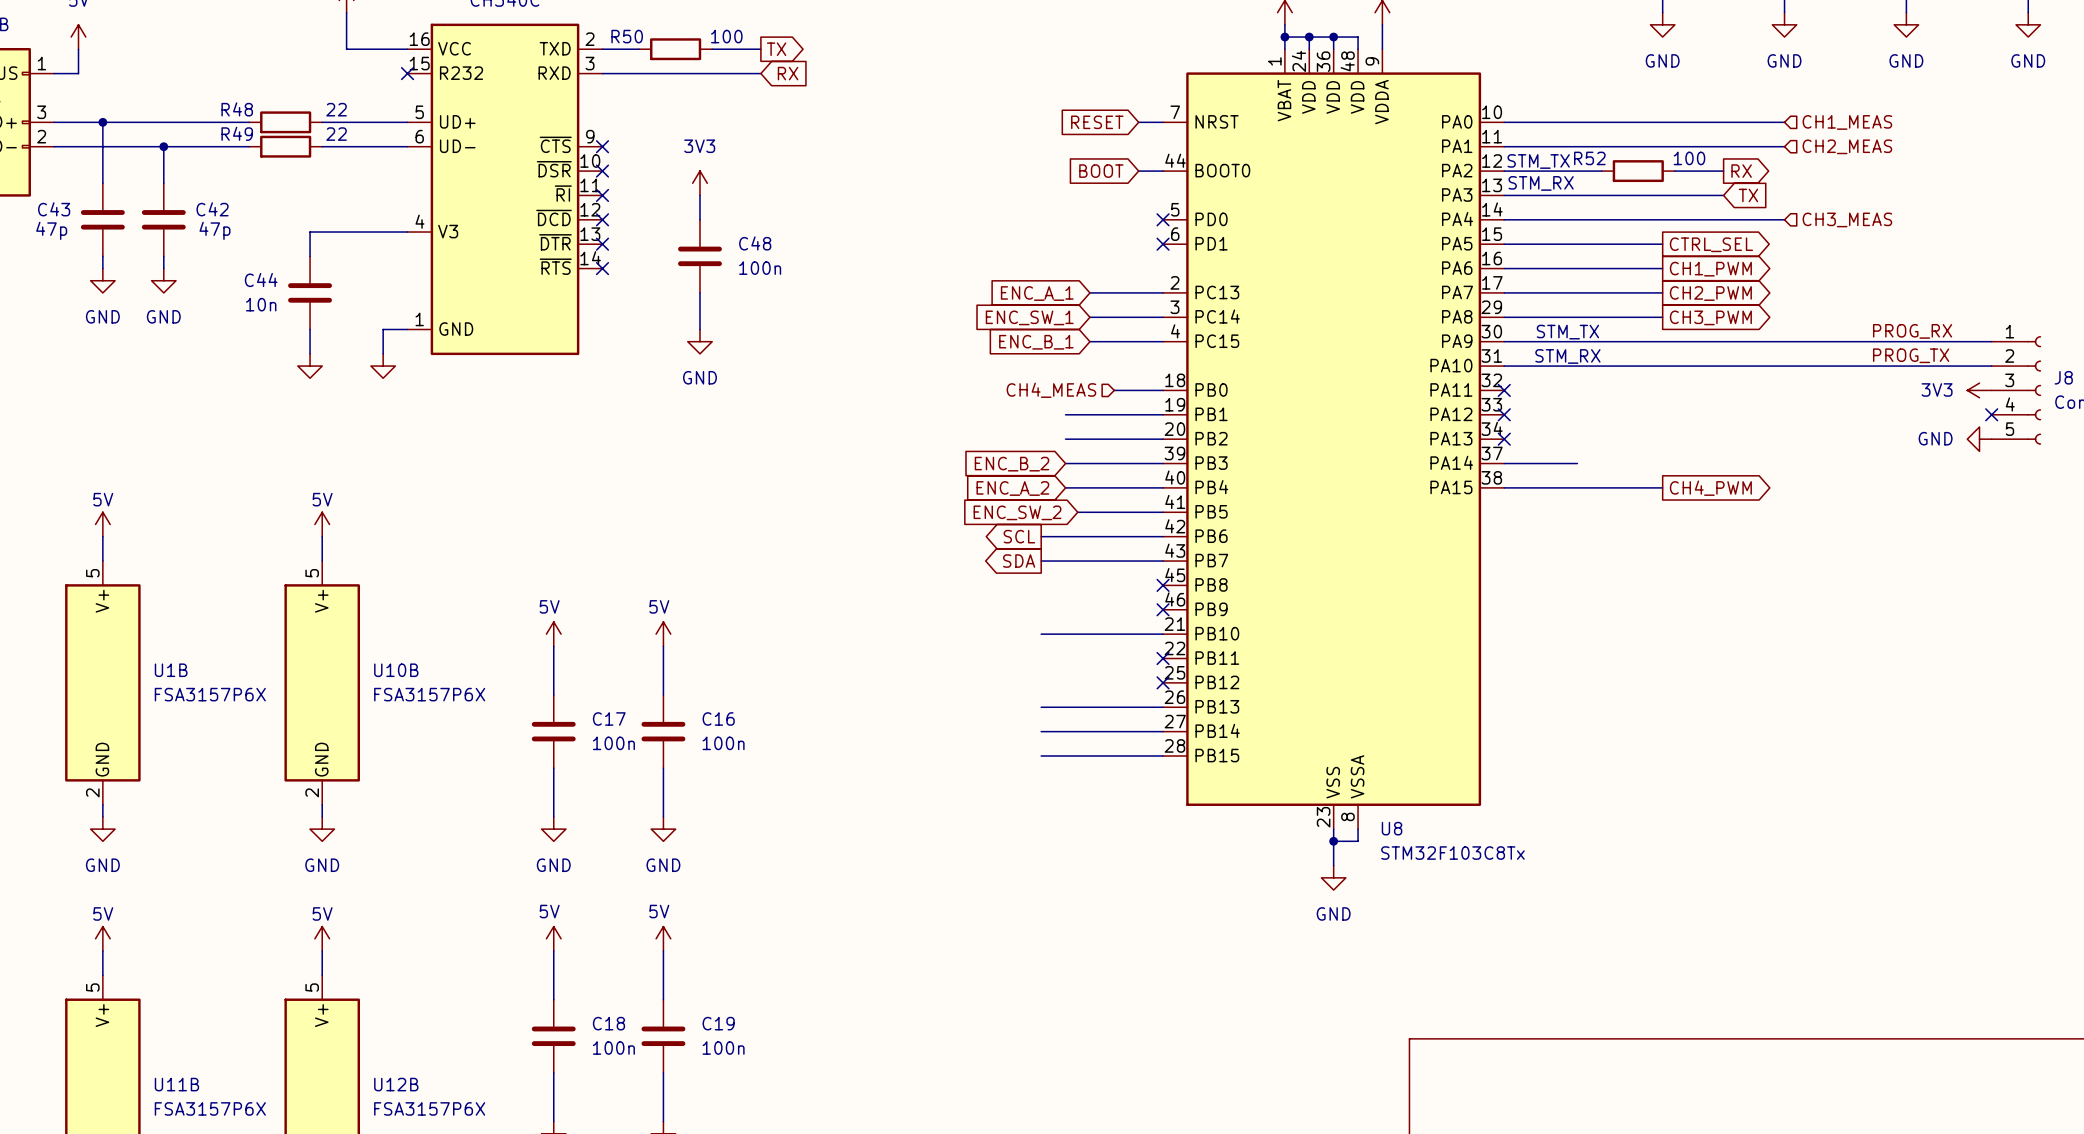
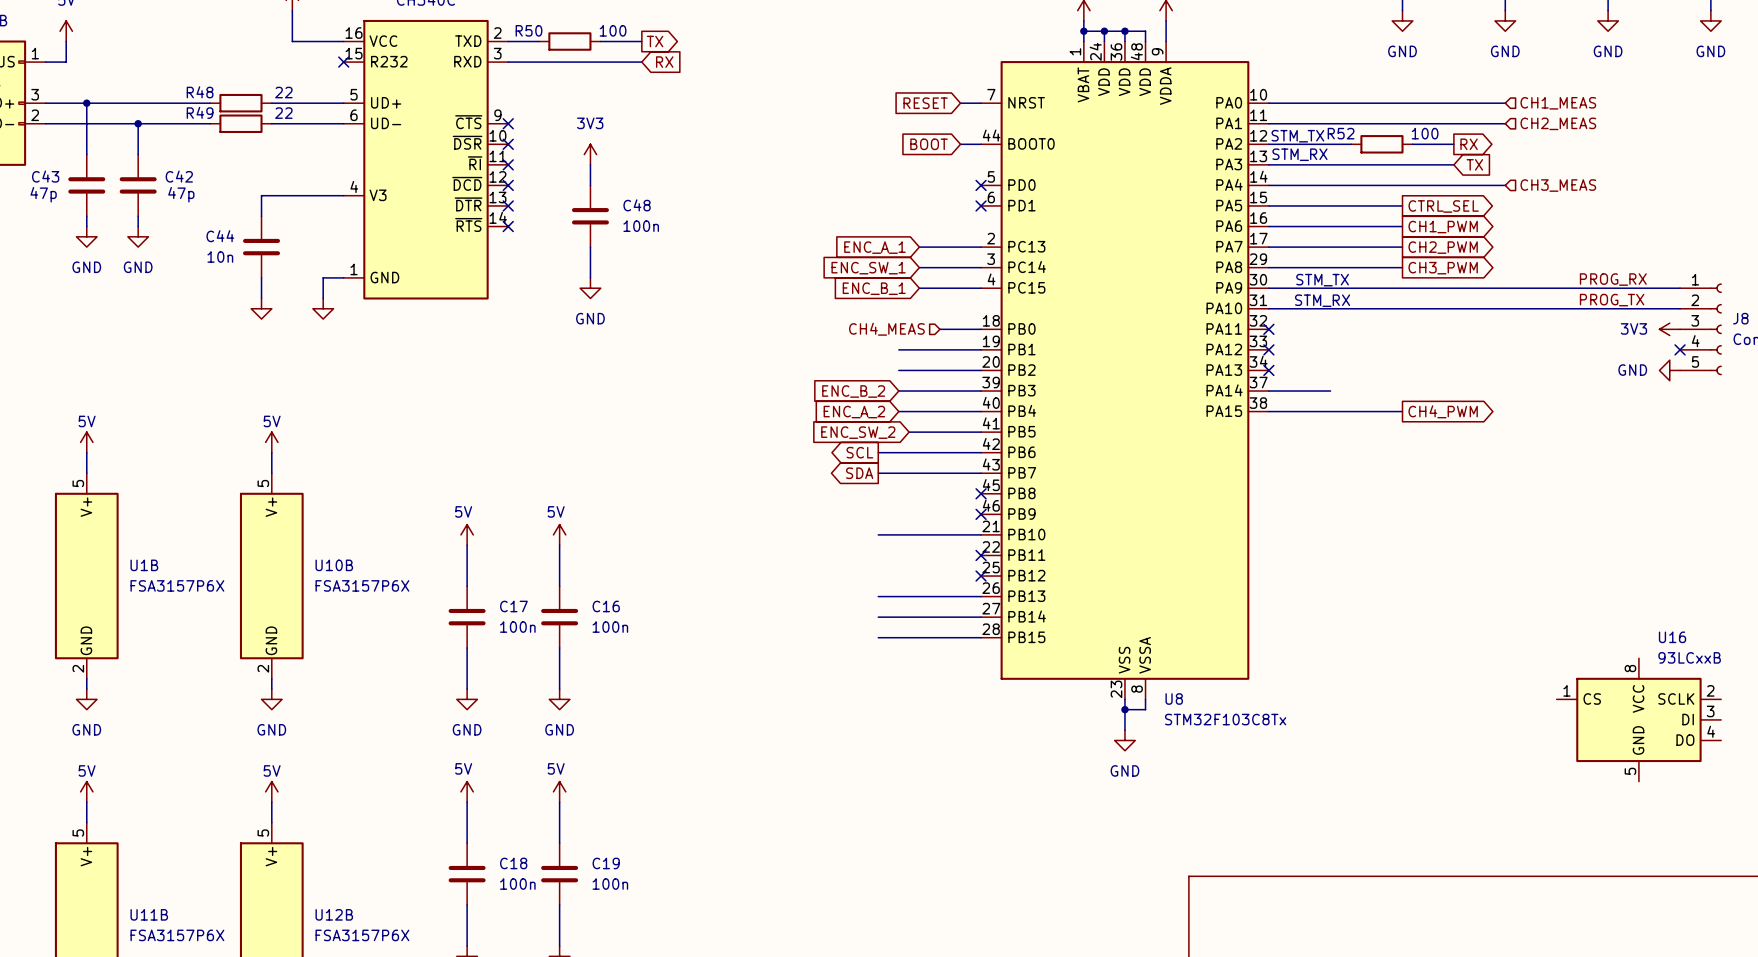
U16: none -> 93LCxxB (1638, 719)

